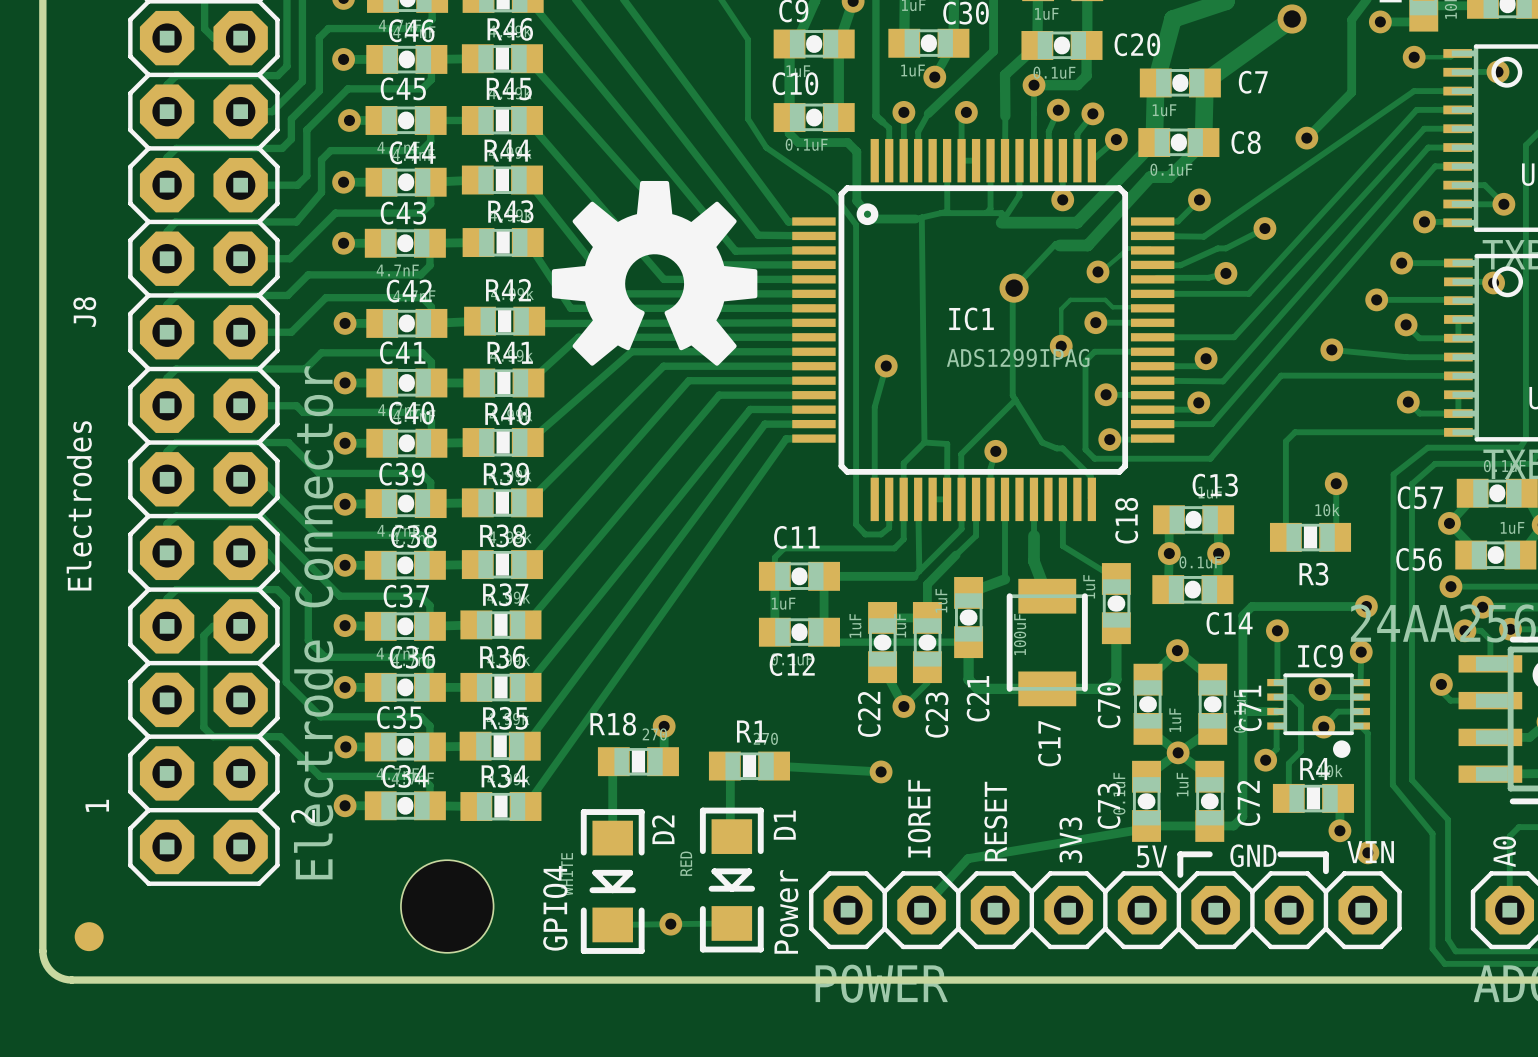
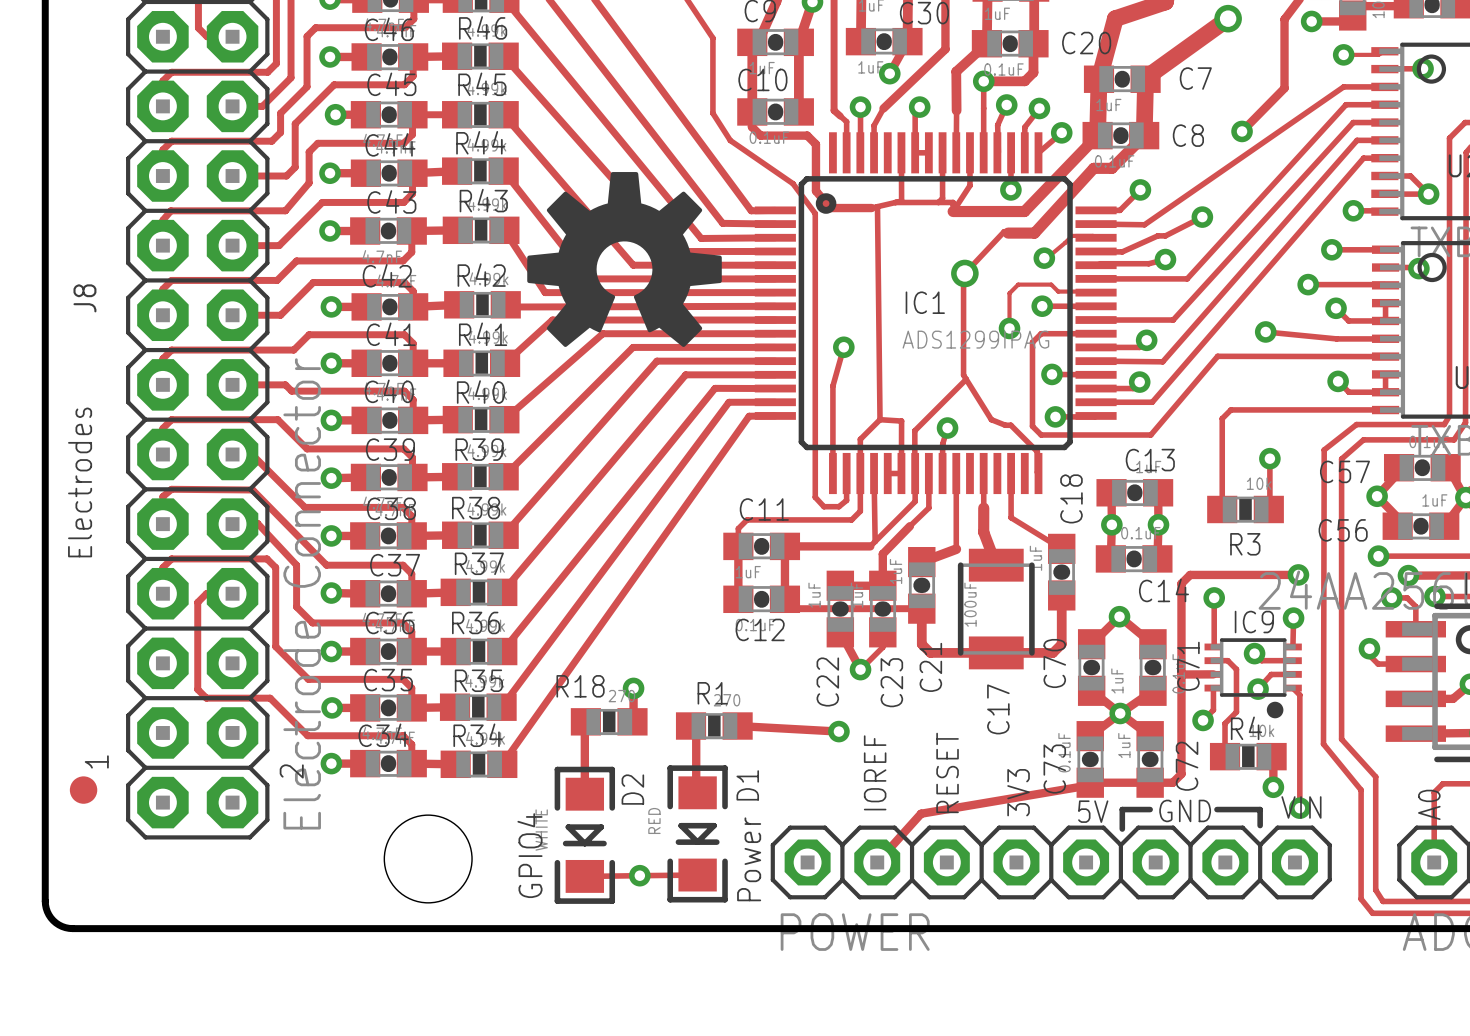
part position: (89, 936) -> (83, 790)

